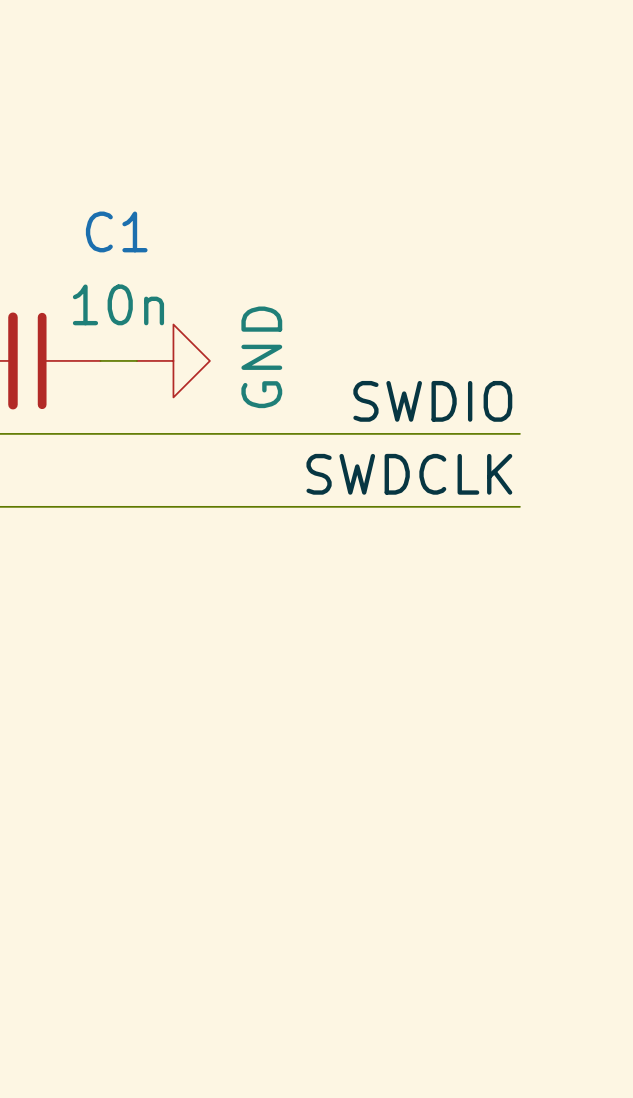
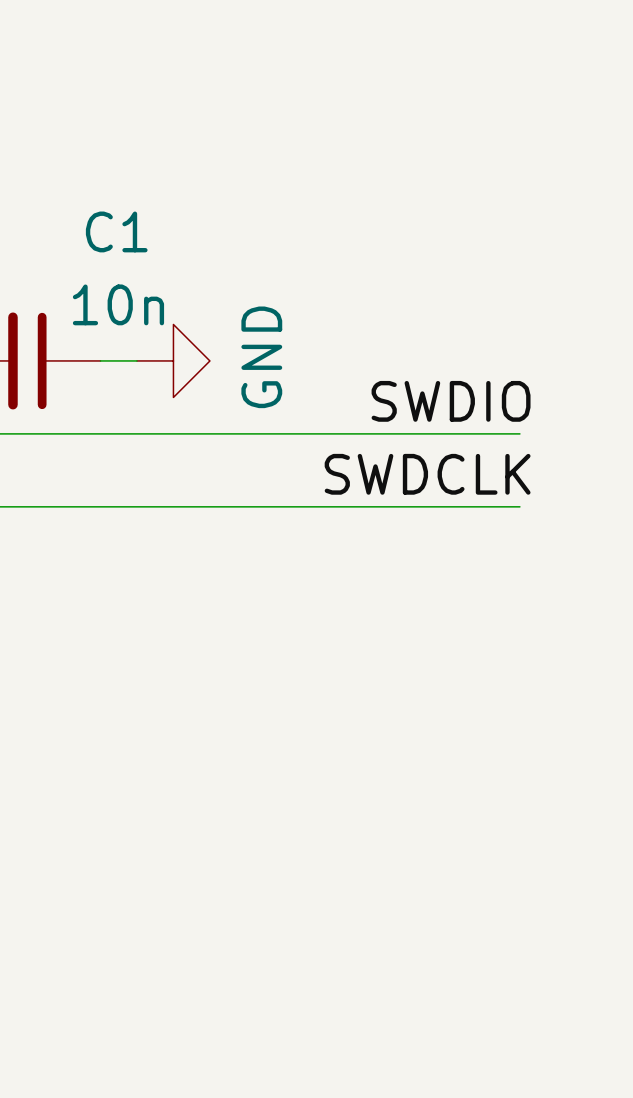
label position: SWDIO (432, 401) -> SWDIO (451, 401)
label position: SWDCLK (409, 474) -> SWDCLK (427, 474)

